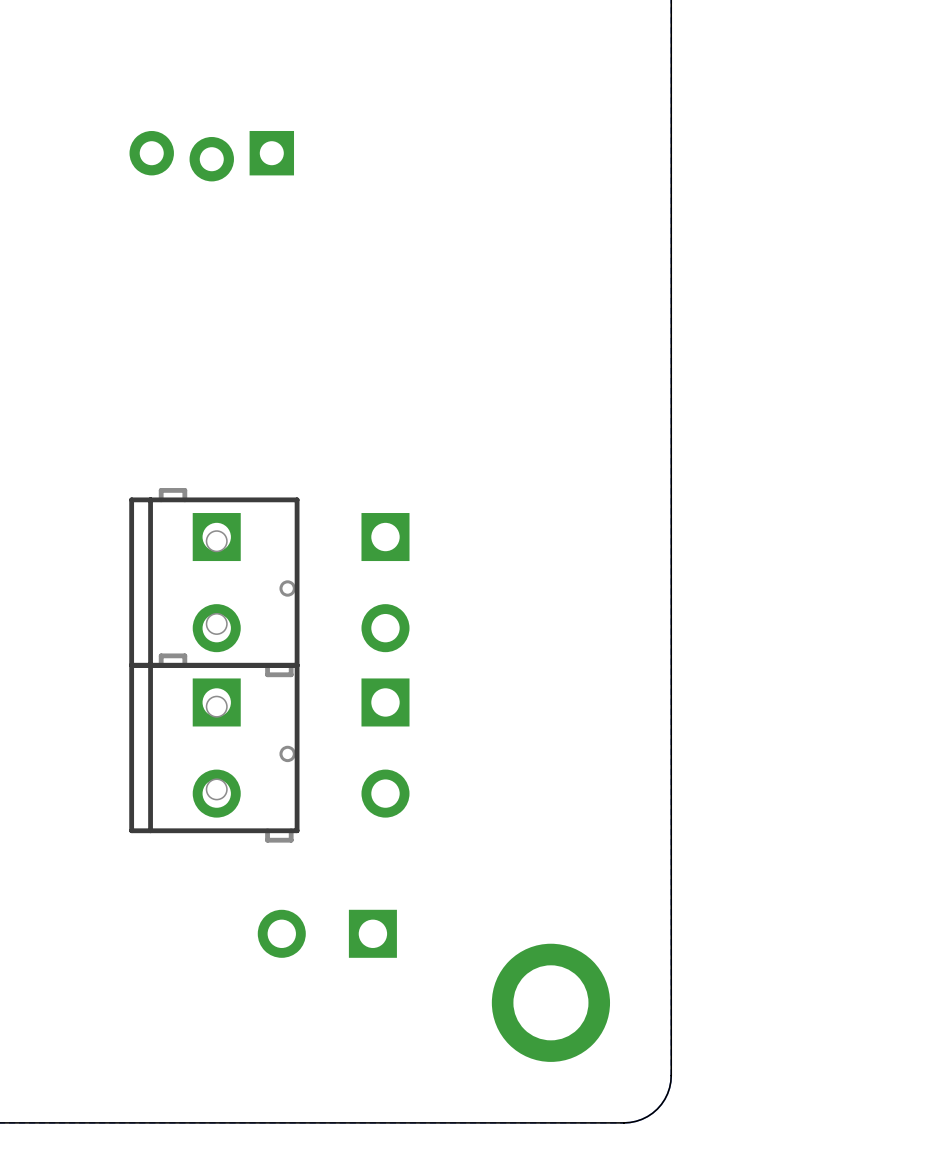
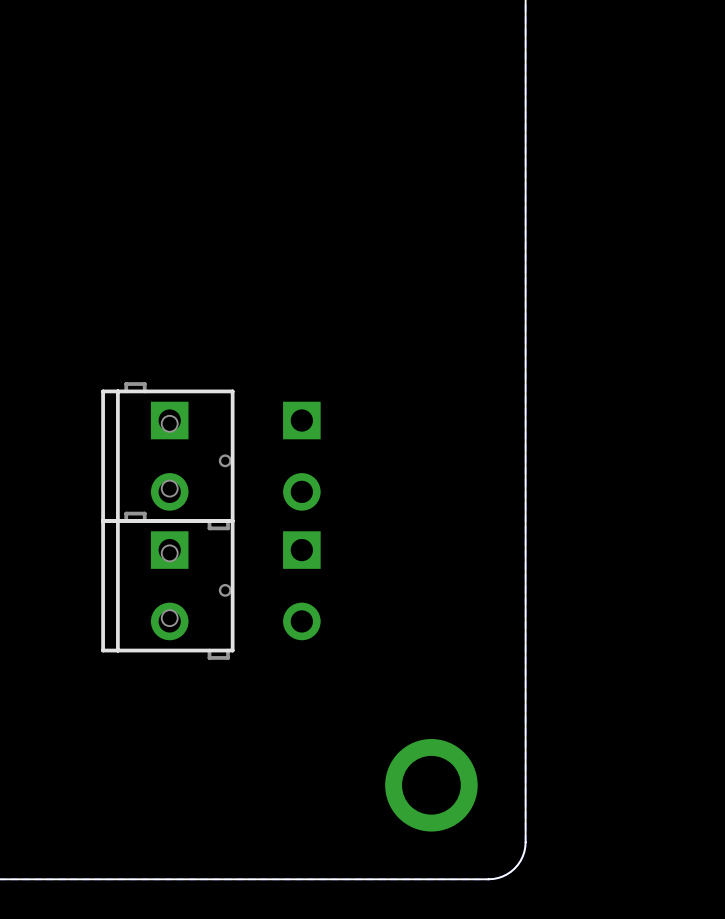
part: (211, 156) -> none
part: (327, 933) -> none

